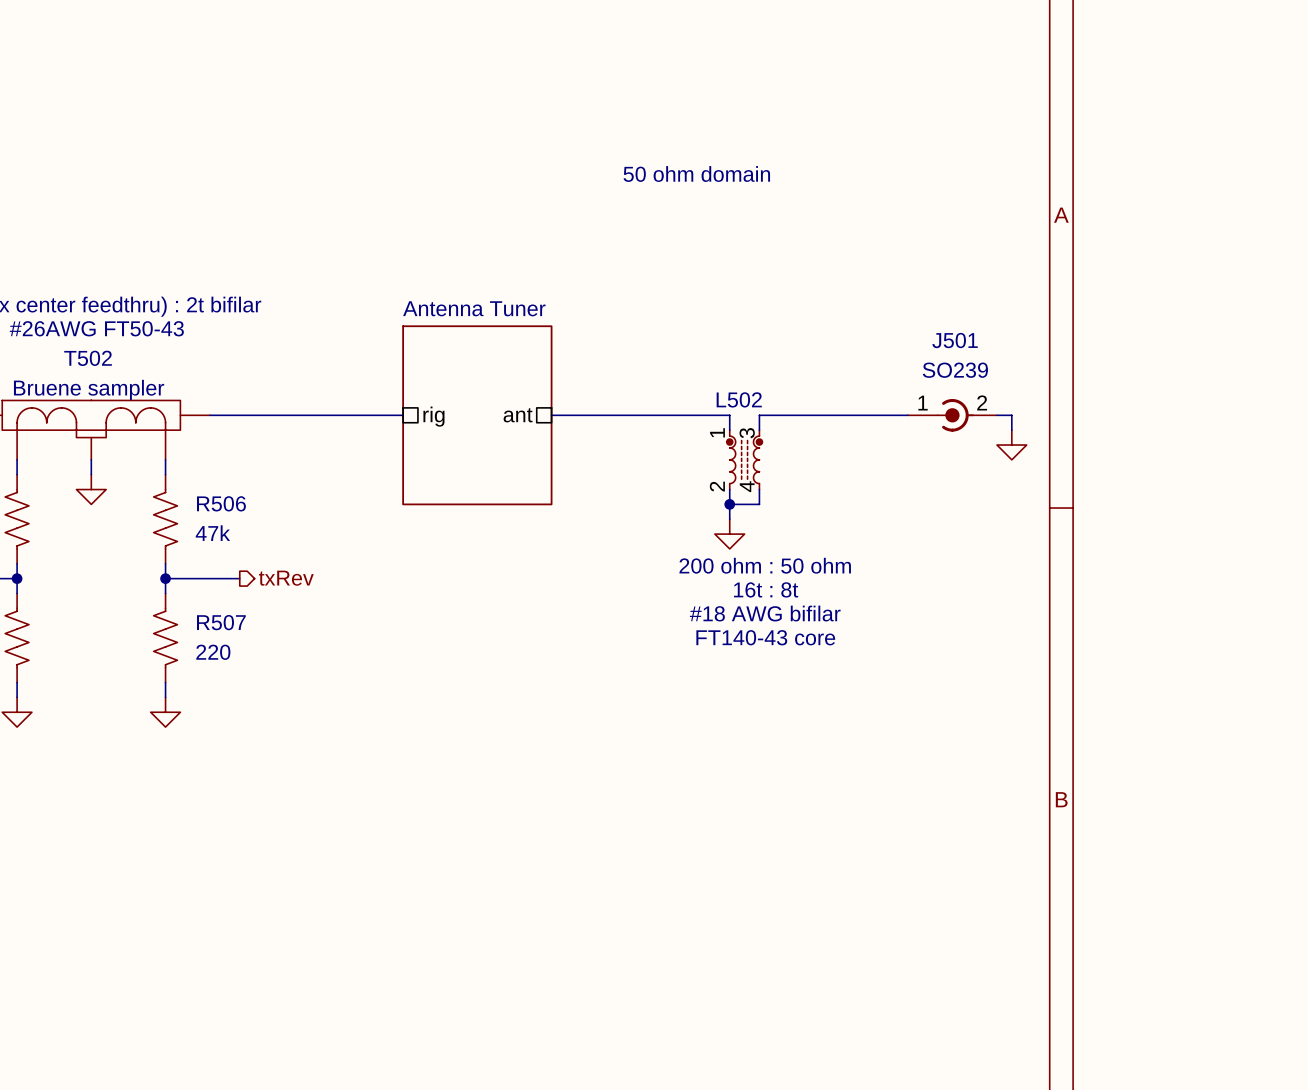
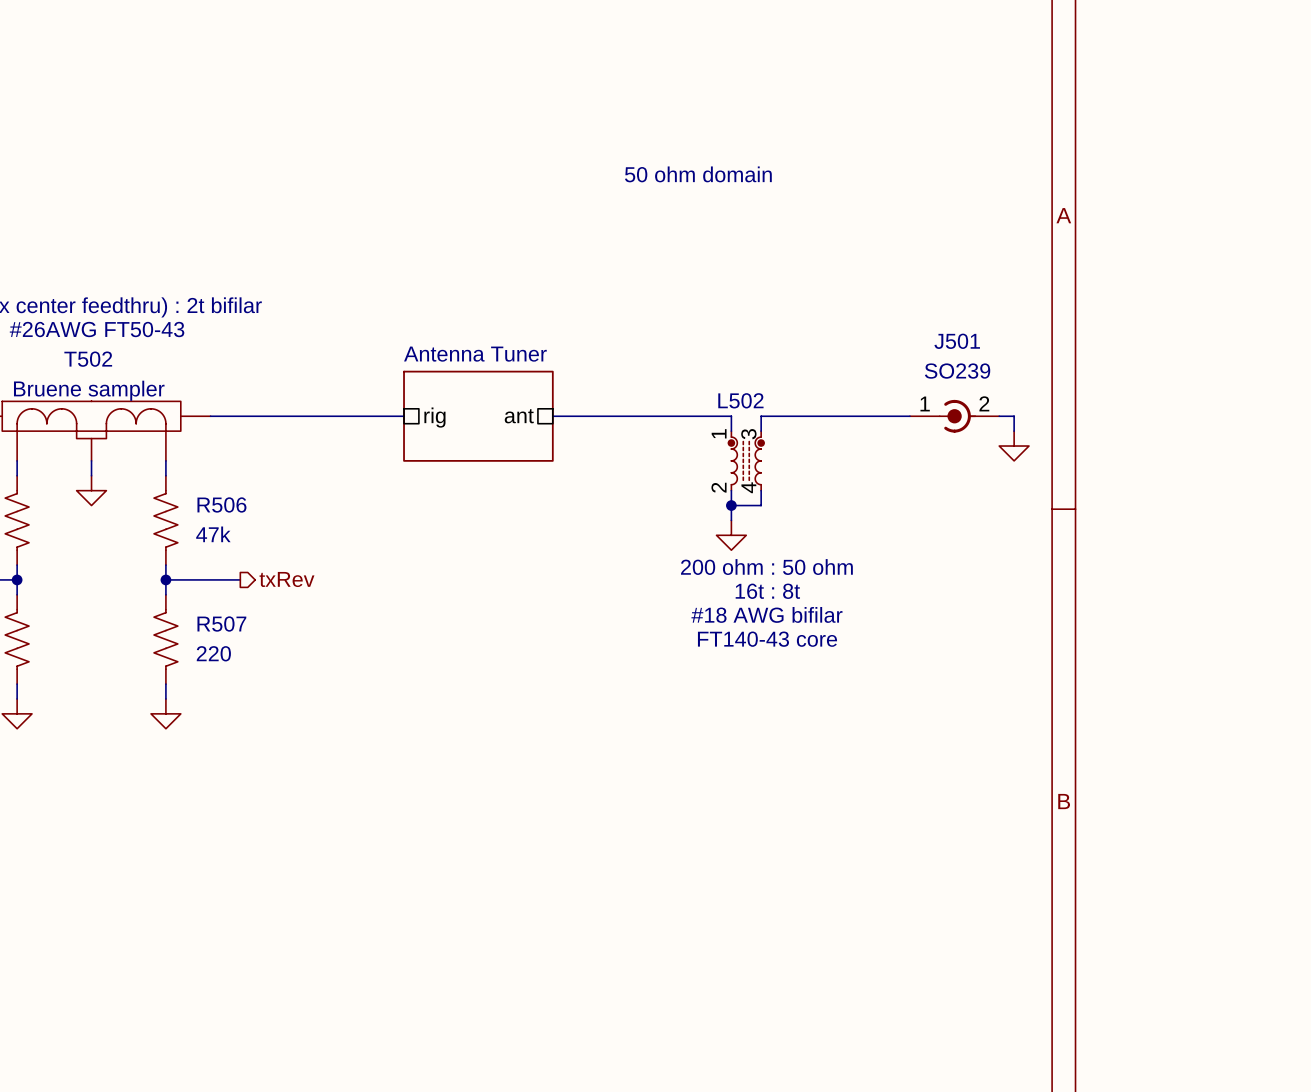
sheet Antenna Tuner name position: Antenna Tuner (474, 308) -> Antenna Tuner (475, 354)
sheet Antenna Tuner shape: [402, 325, 553, 506] -> [403, 370, 554, 462]

